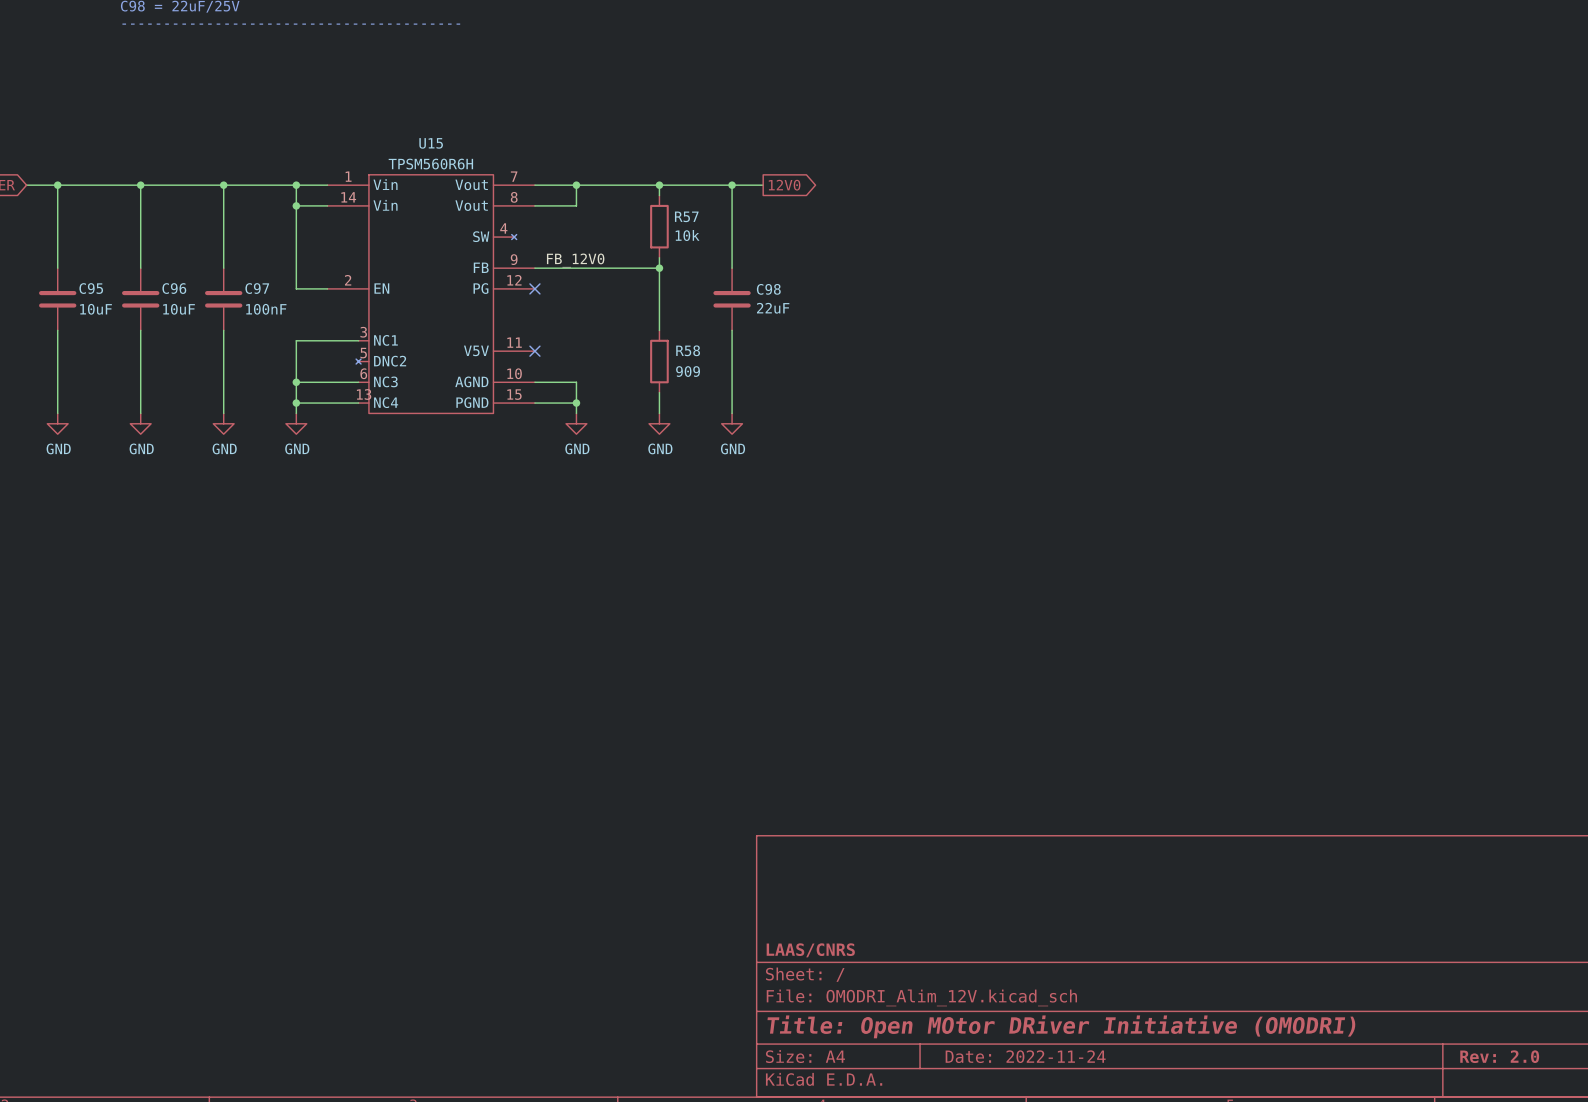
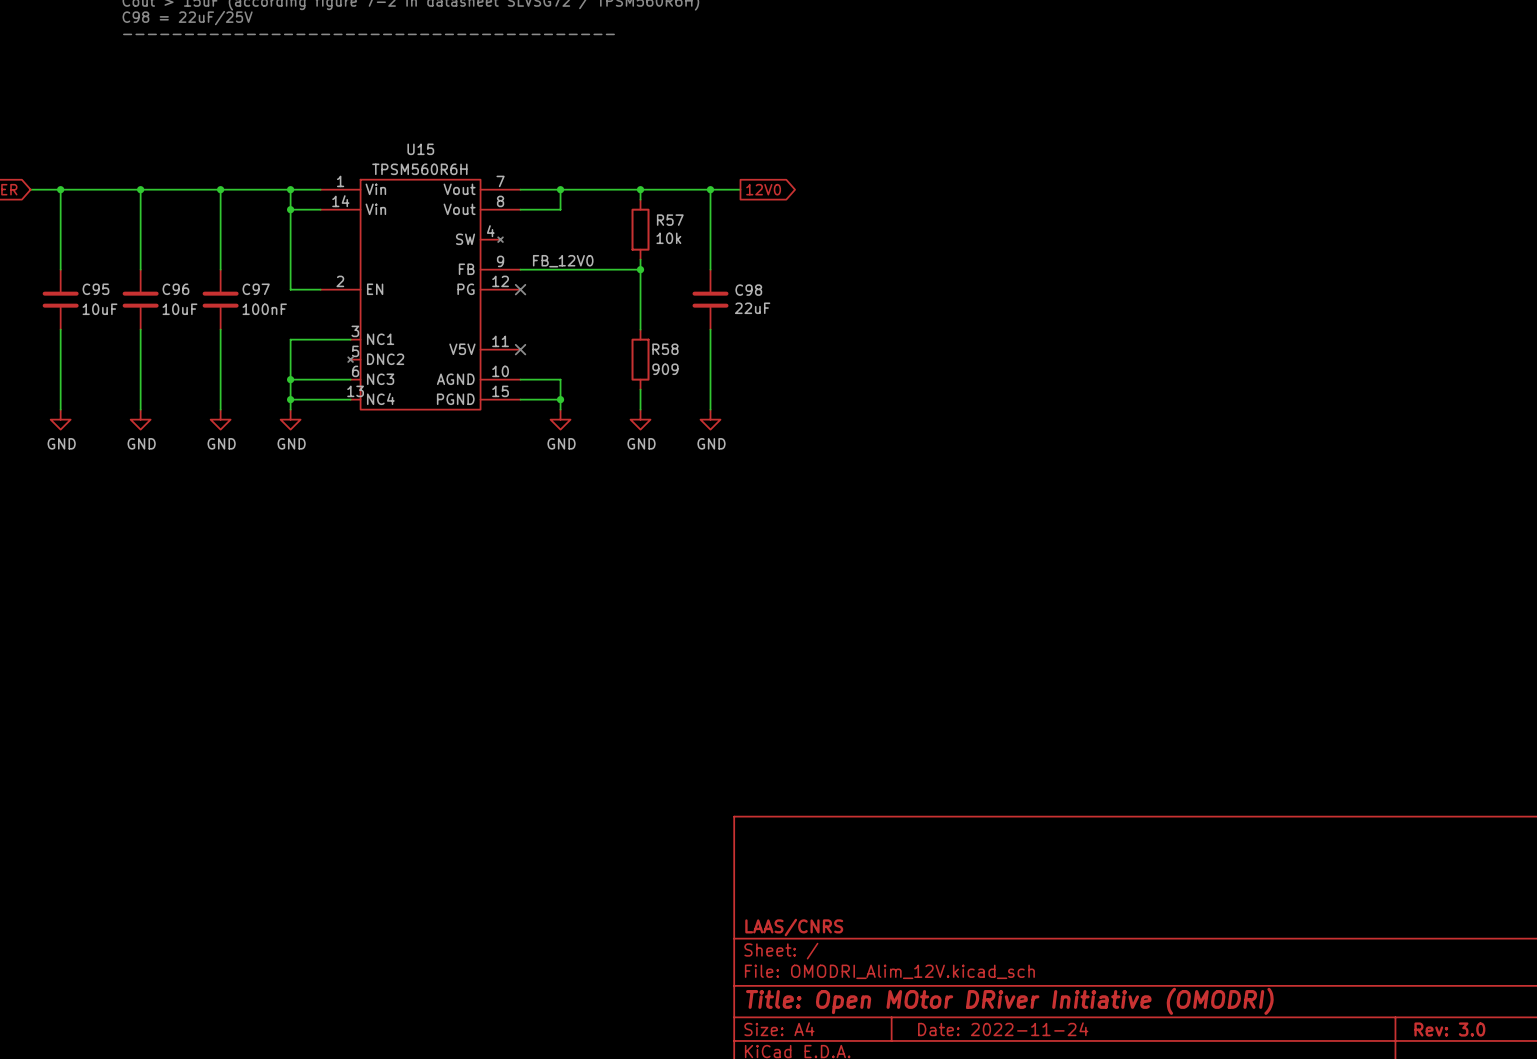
title block: Rev: 2.0 (1499, 1056) -> Rev: 3.0 (1449, 1029)

